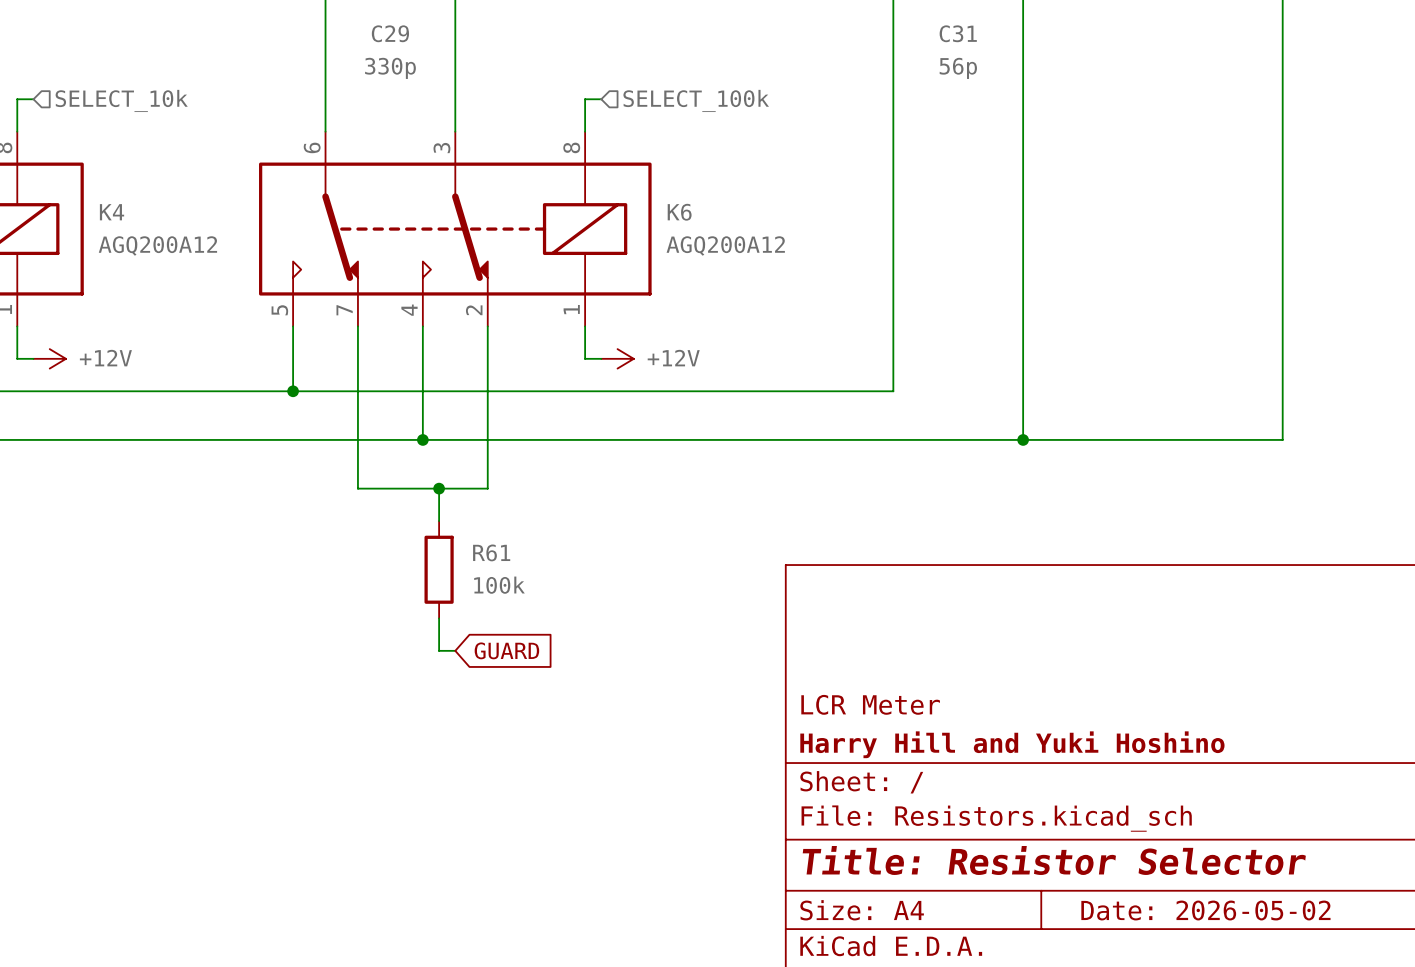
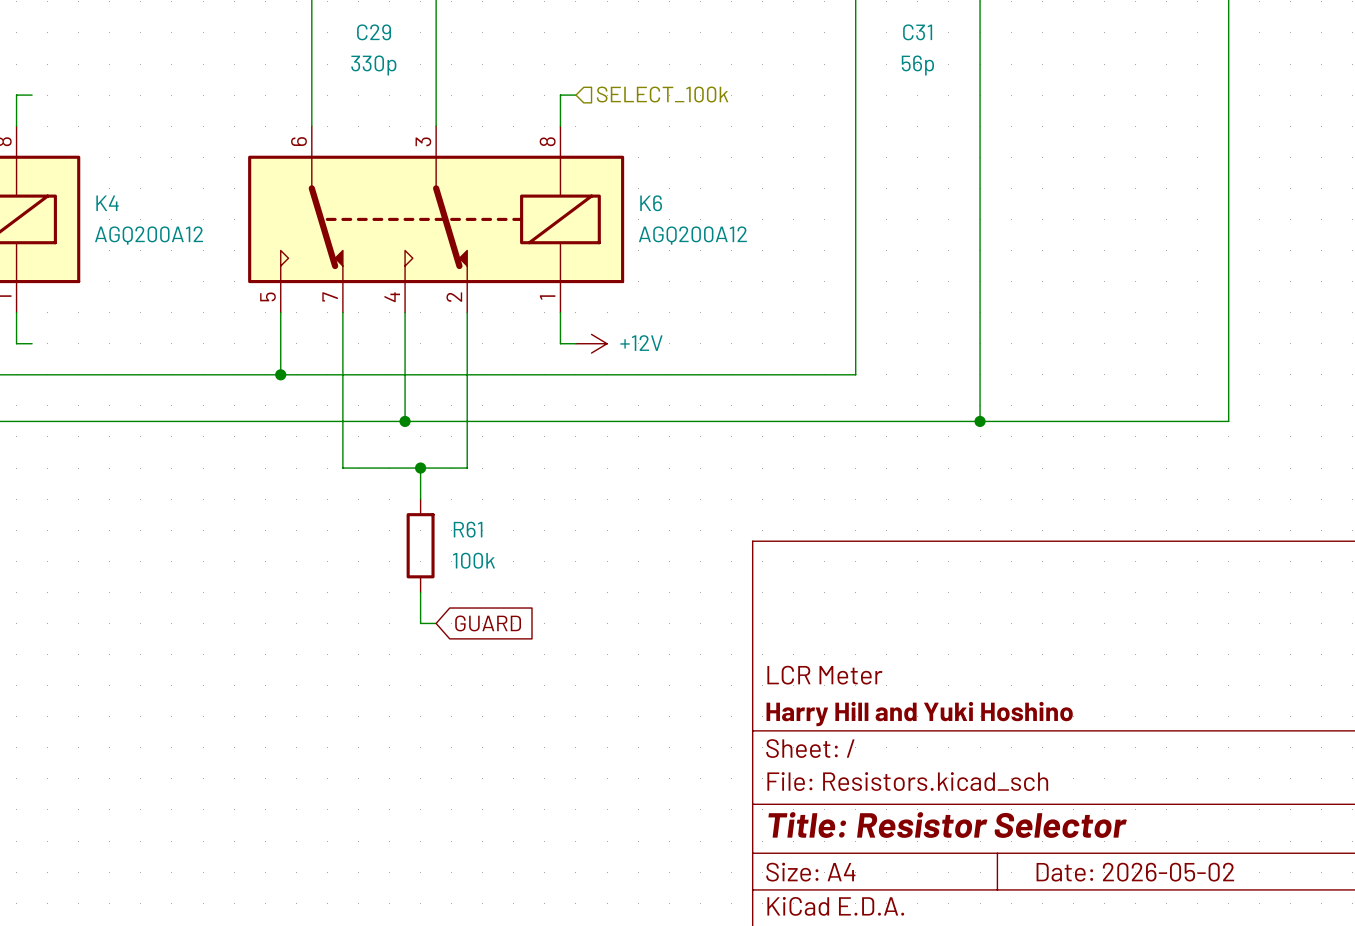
hierarchical label: SELECT_10k (121, 100) -> none
power symbol: +12V (49, 358) -> none

